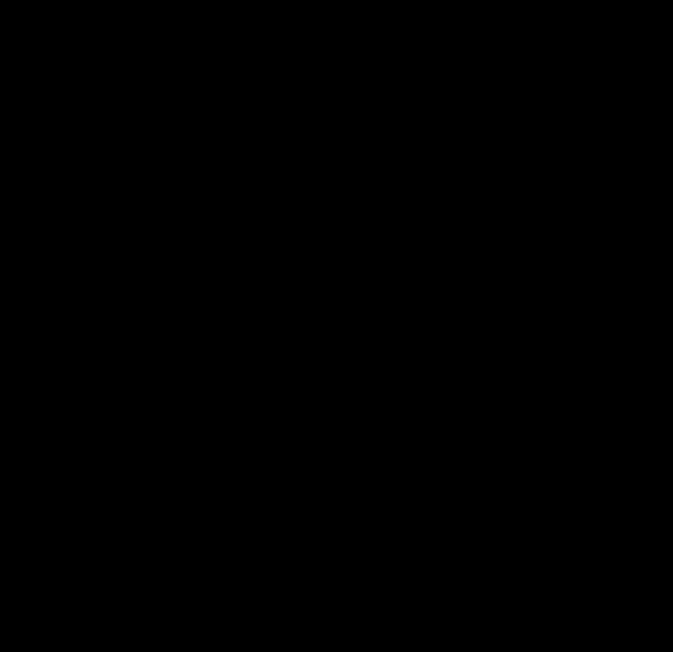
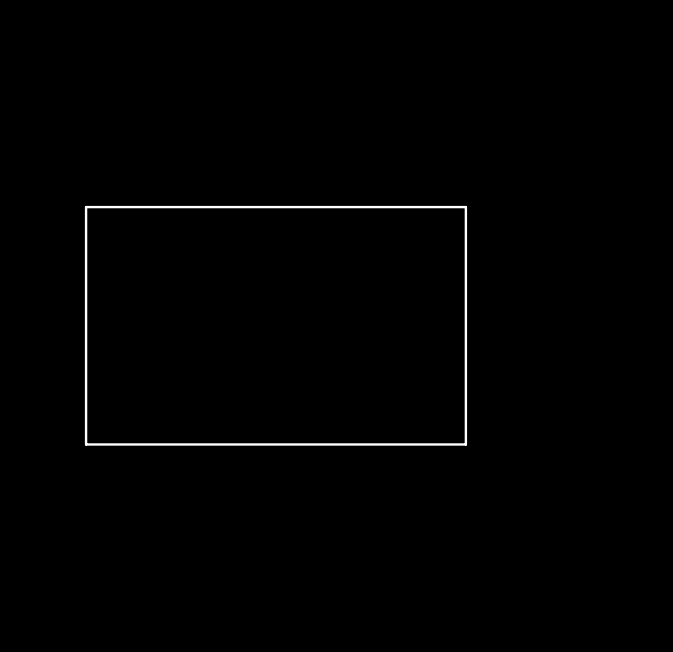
board edge: none -> (465, 207) (86, 207) (86, 444) (465, 444) (465, 207)

